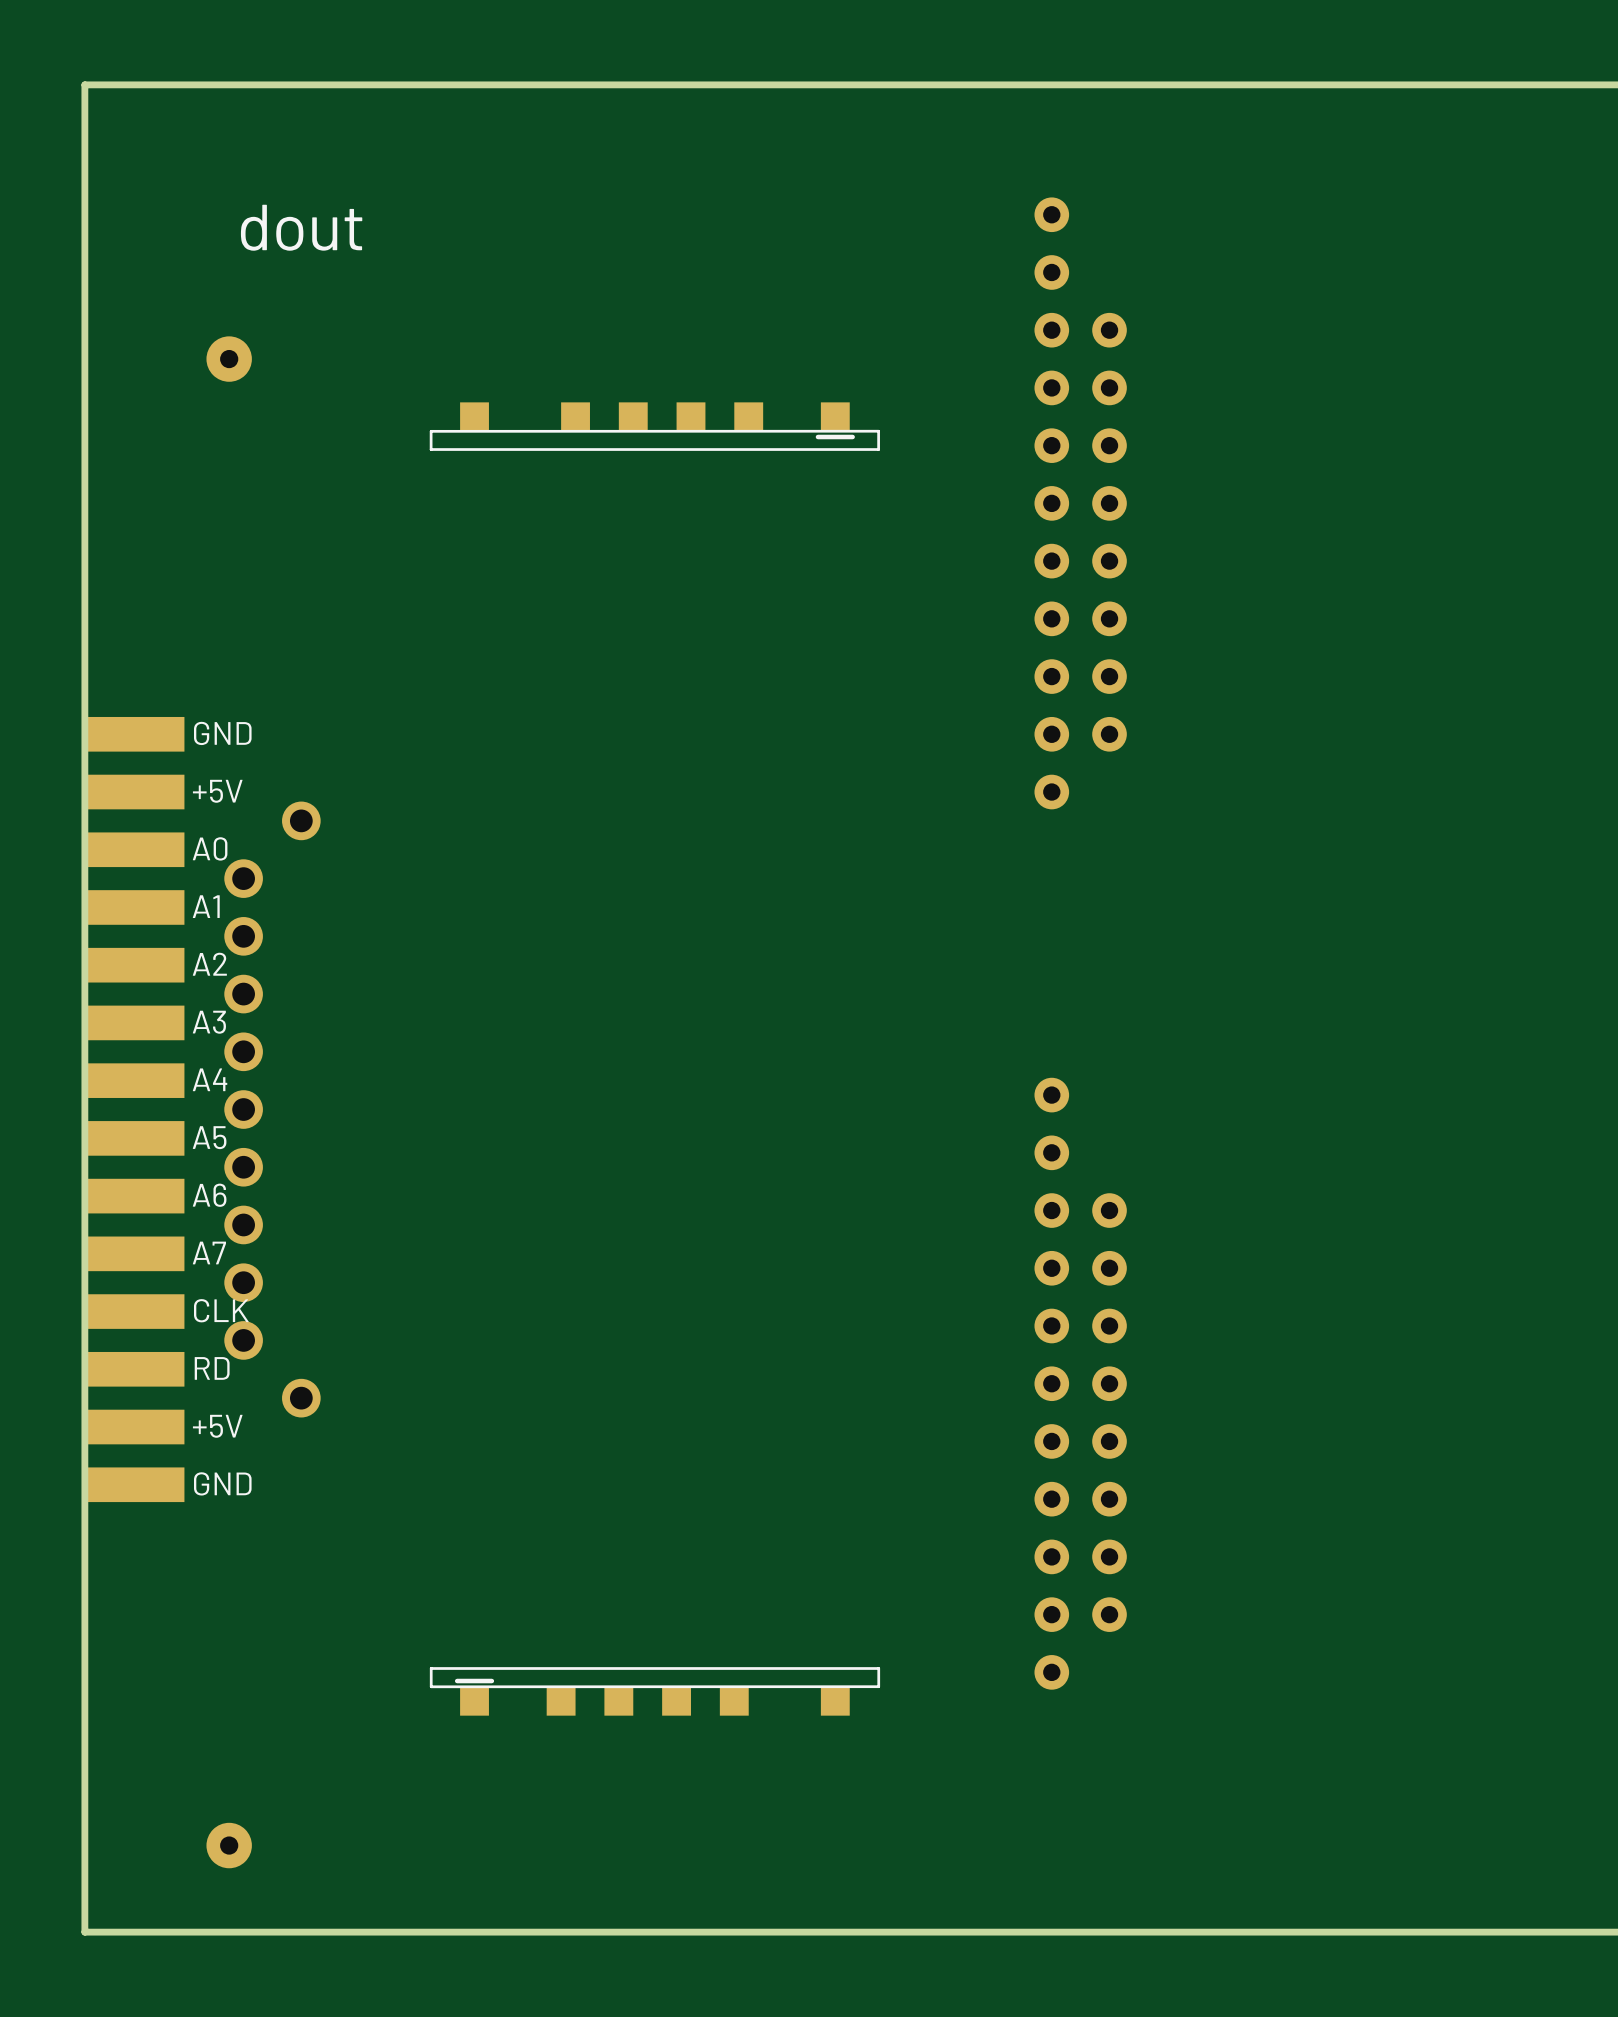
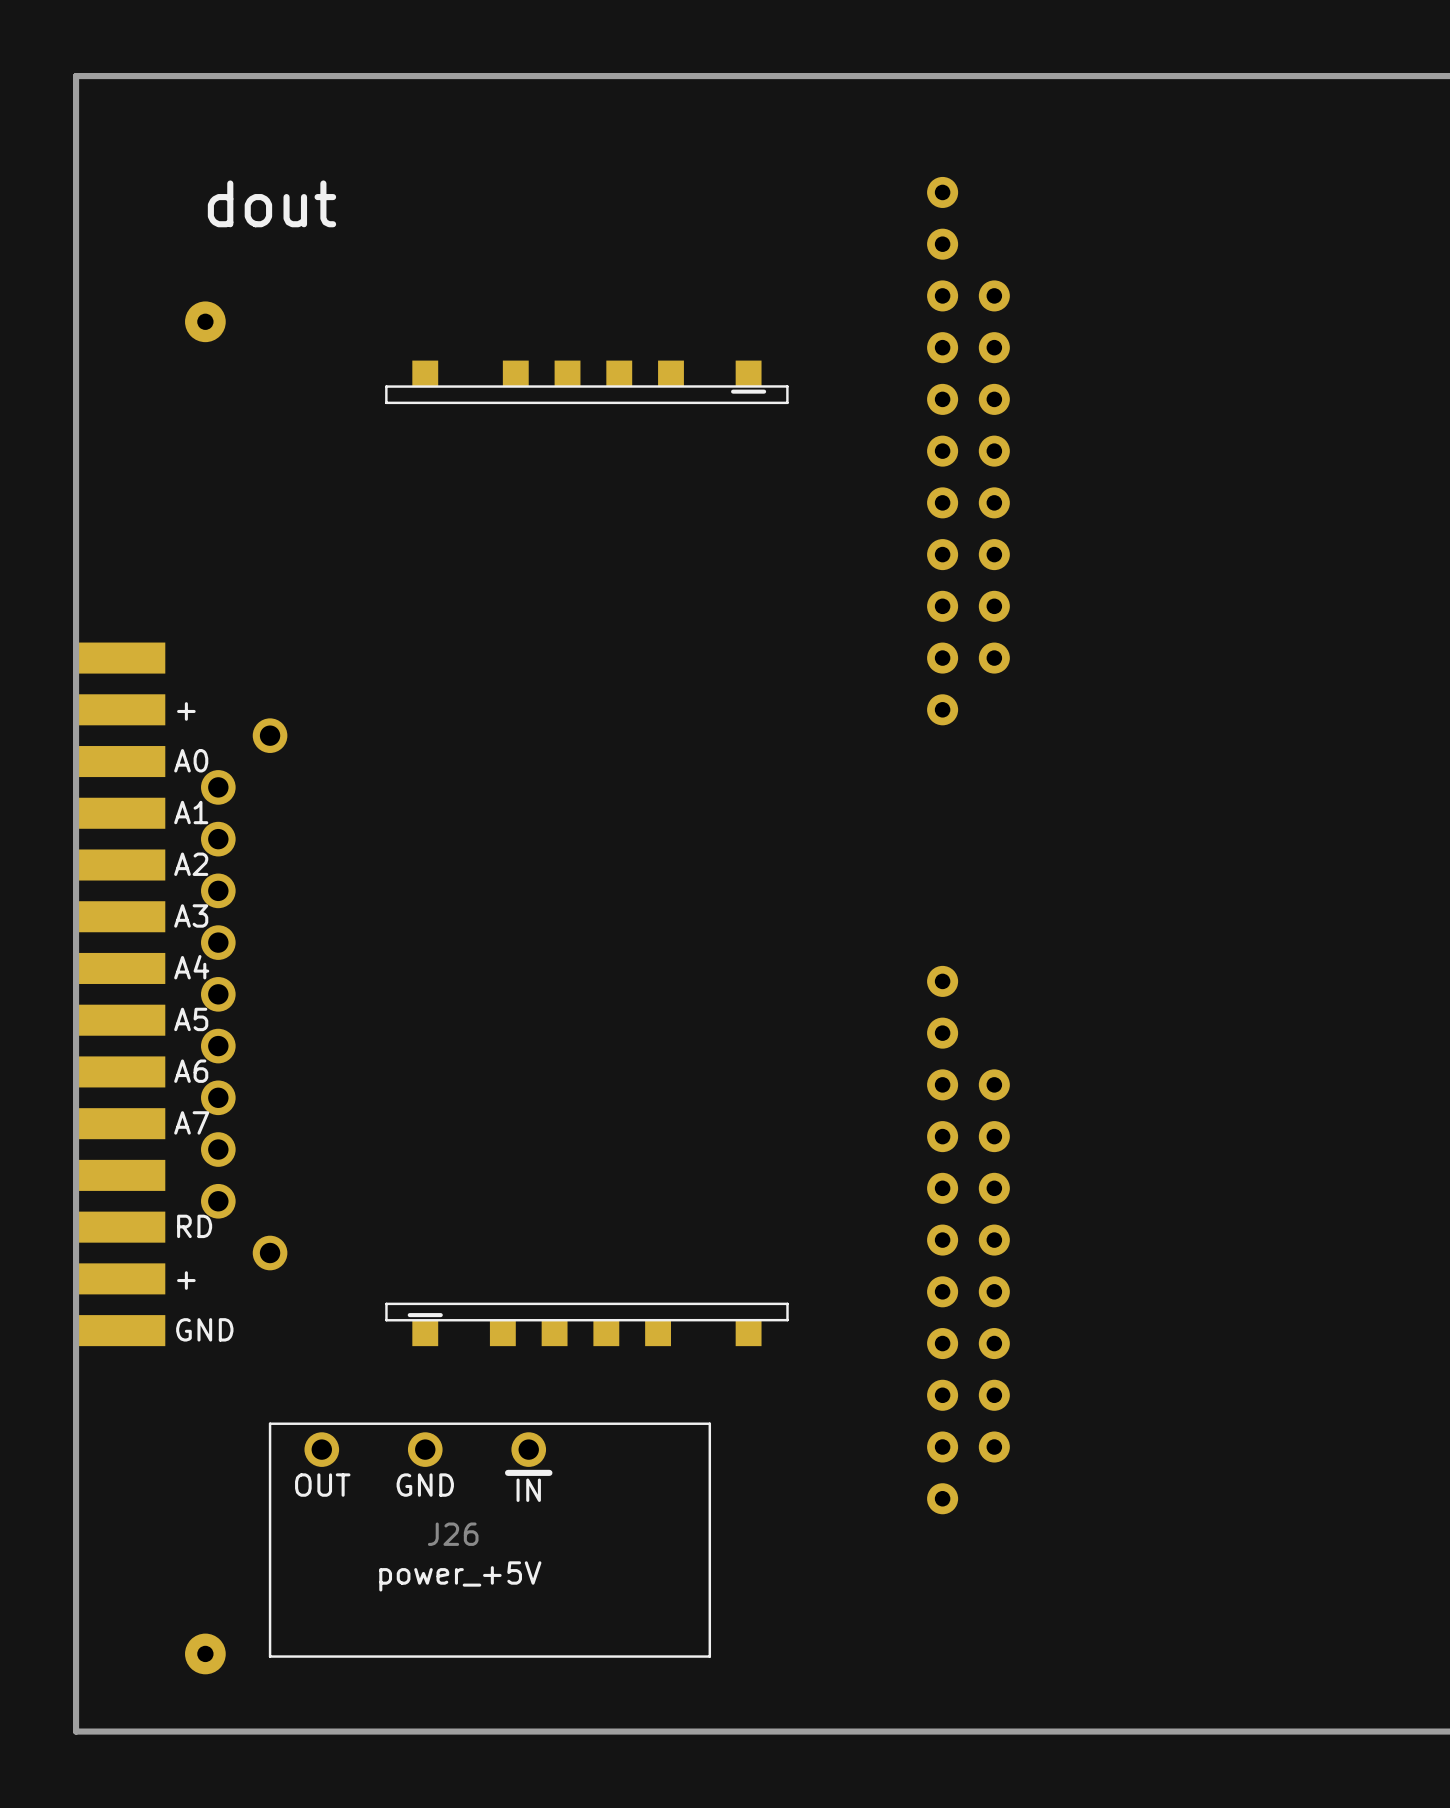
part text: GND (222, 733) -> none
part text: +5V (217, 791) -> + (186, 711)
part text: CLK (221, 1310) -> none
part text: +5V (217, 1426) -> + (186, 1280)
part position: (654, 1691) -> (586, 1324)
J26: none -> power_+5V (489, 1540)

